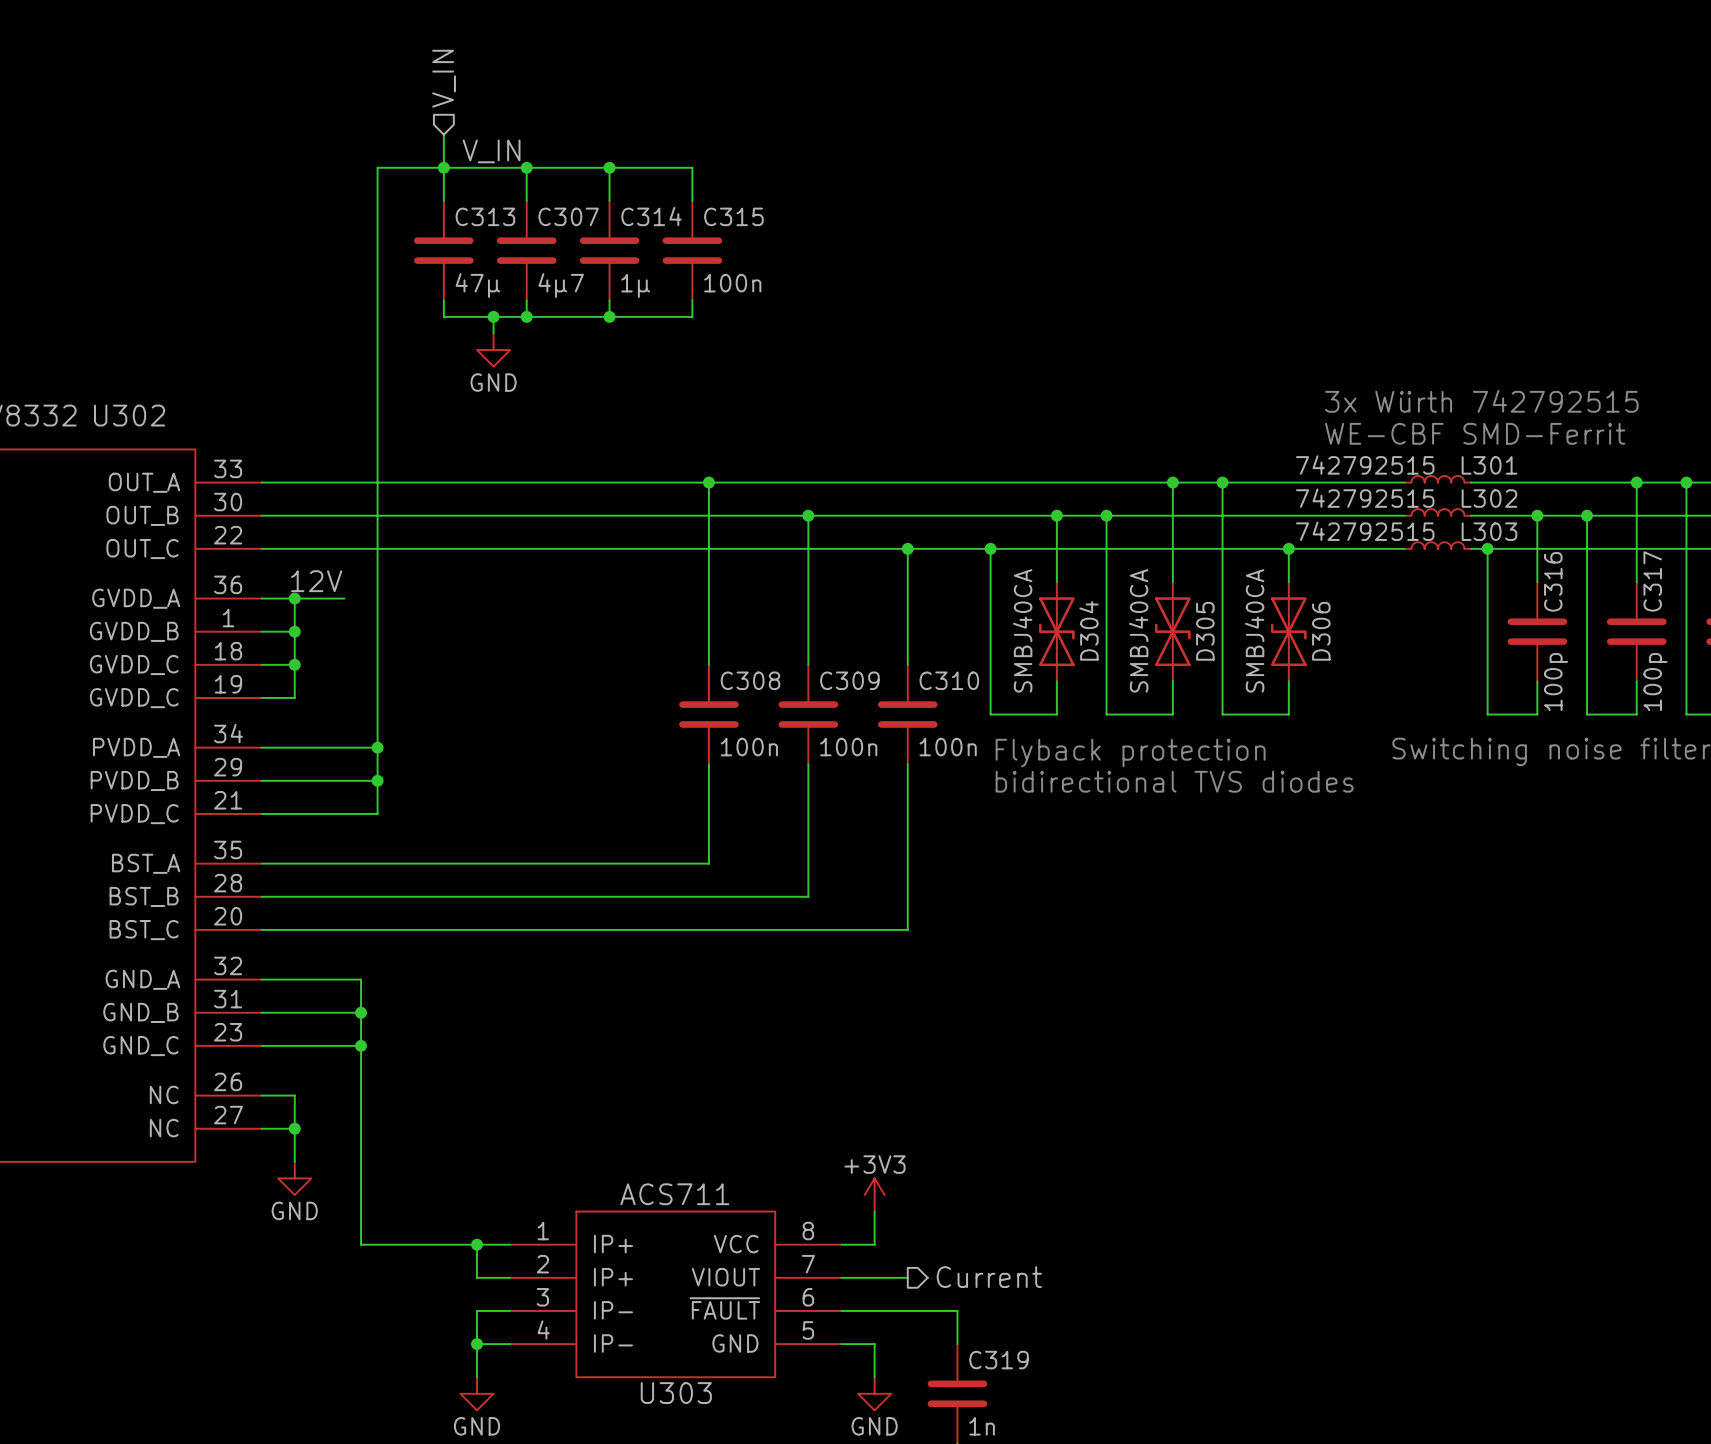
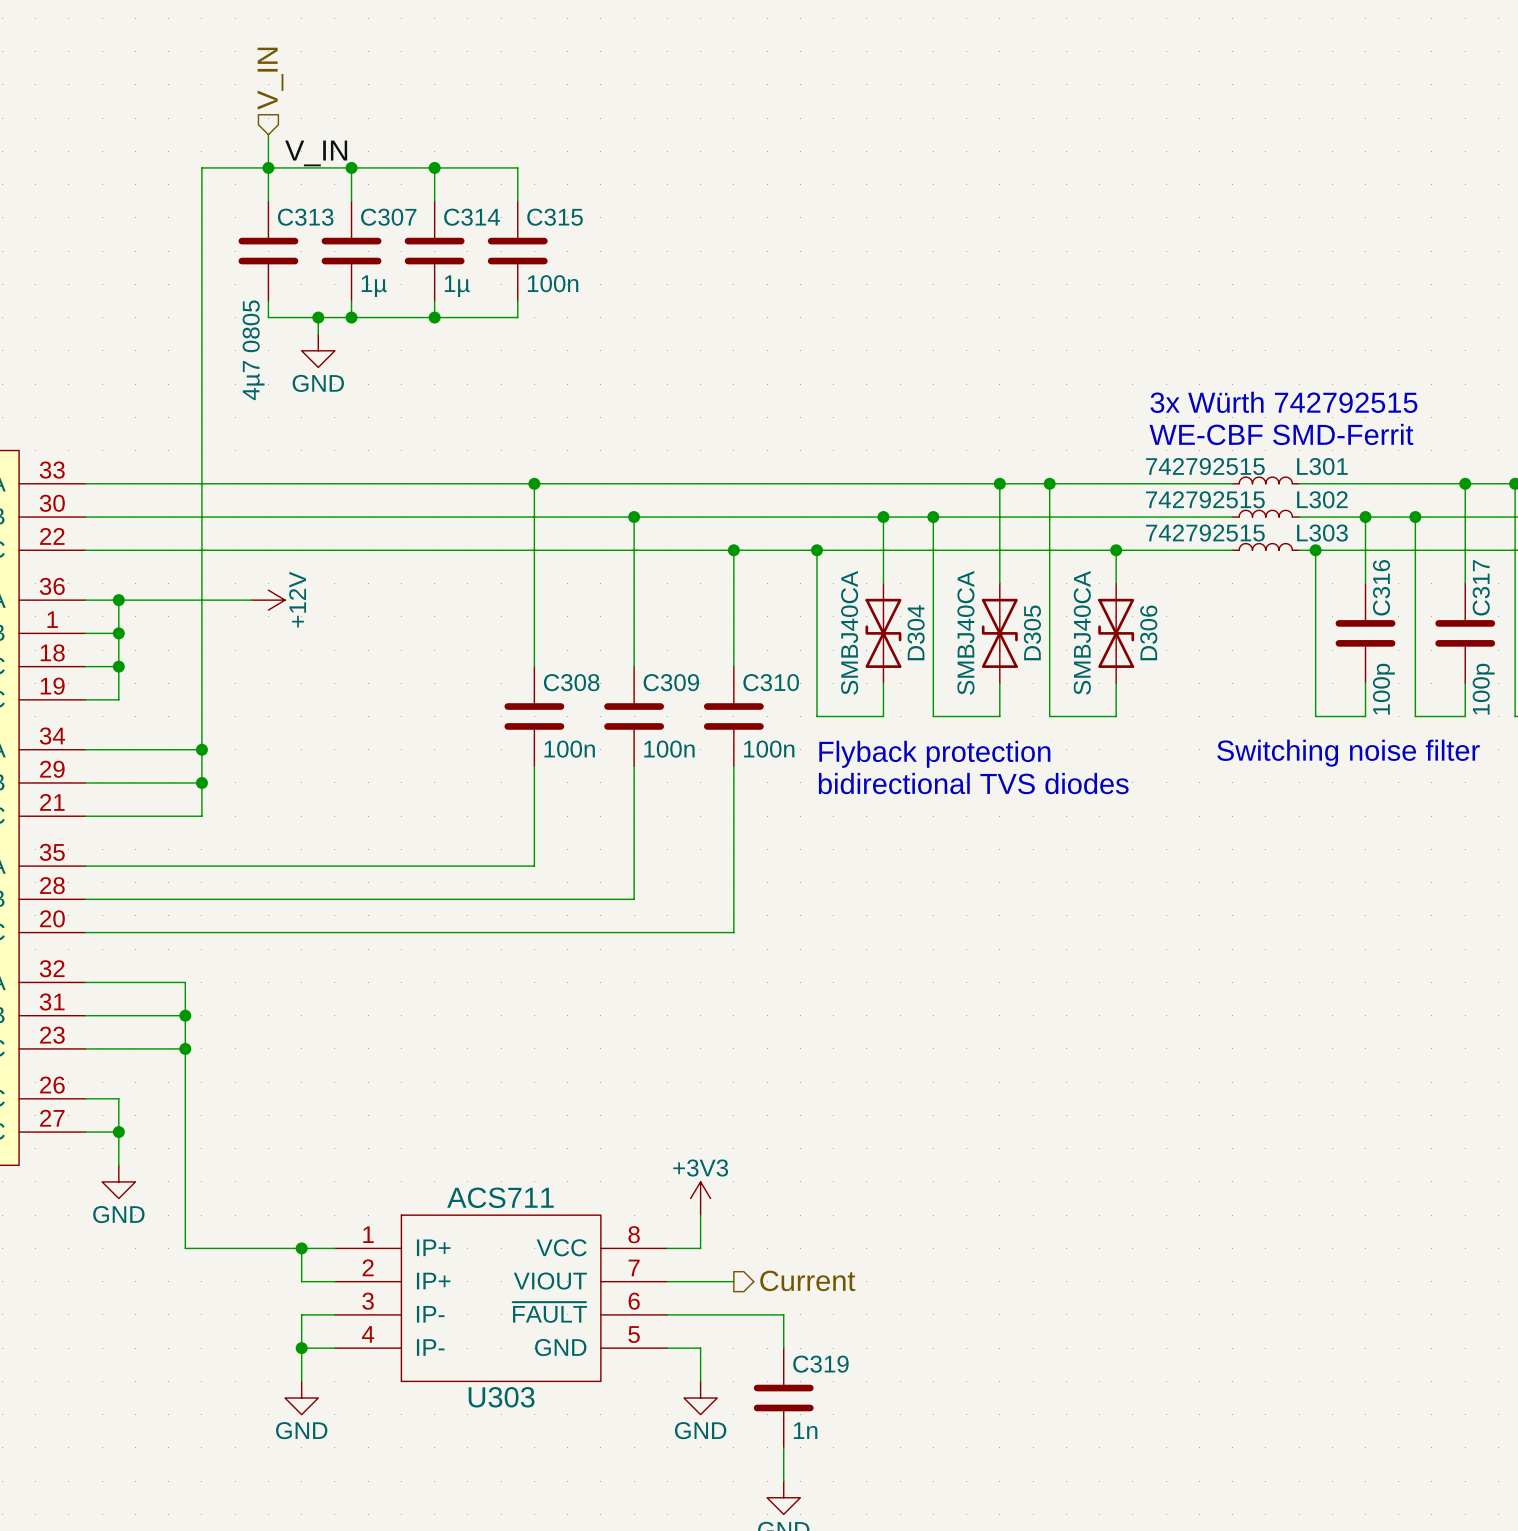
C313 value: 47µ (477, 285) -> 4µ7 0805 (253, 350)
C307 value: 4µ7 (561, 285) -> 1µ (374, 286)
label: 12V (316, 581) -> none
wire: none -> (168, 600) (251, 600)
power symbol: none -> +12V (268, 600)

